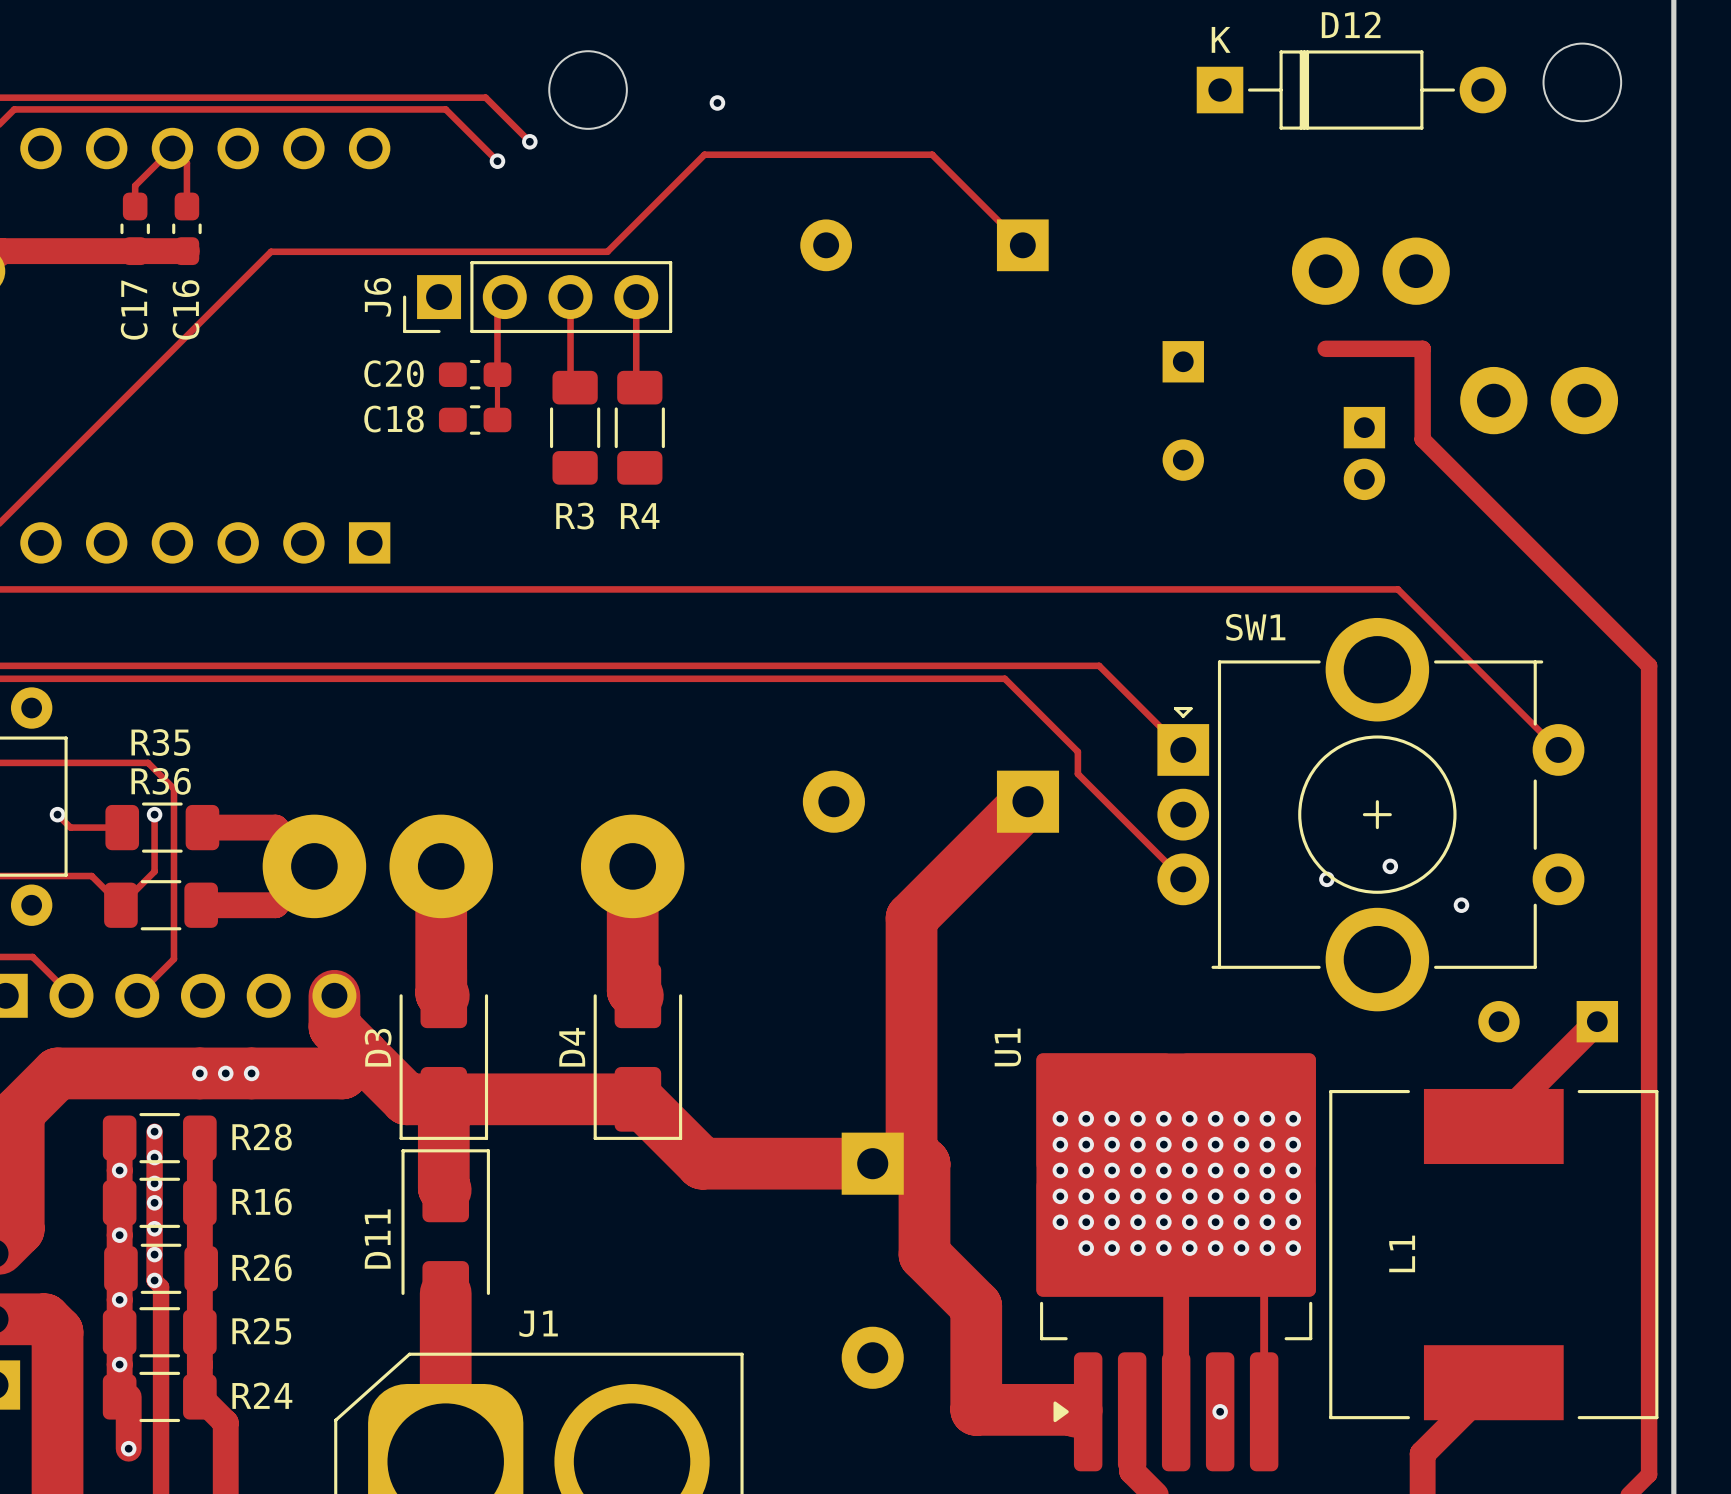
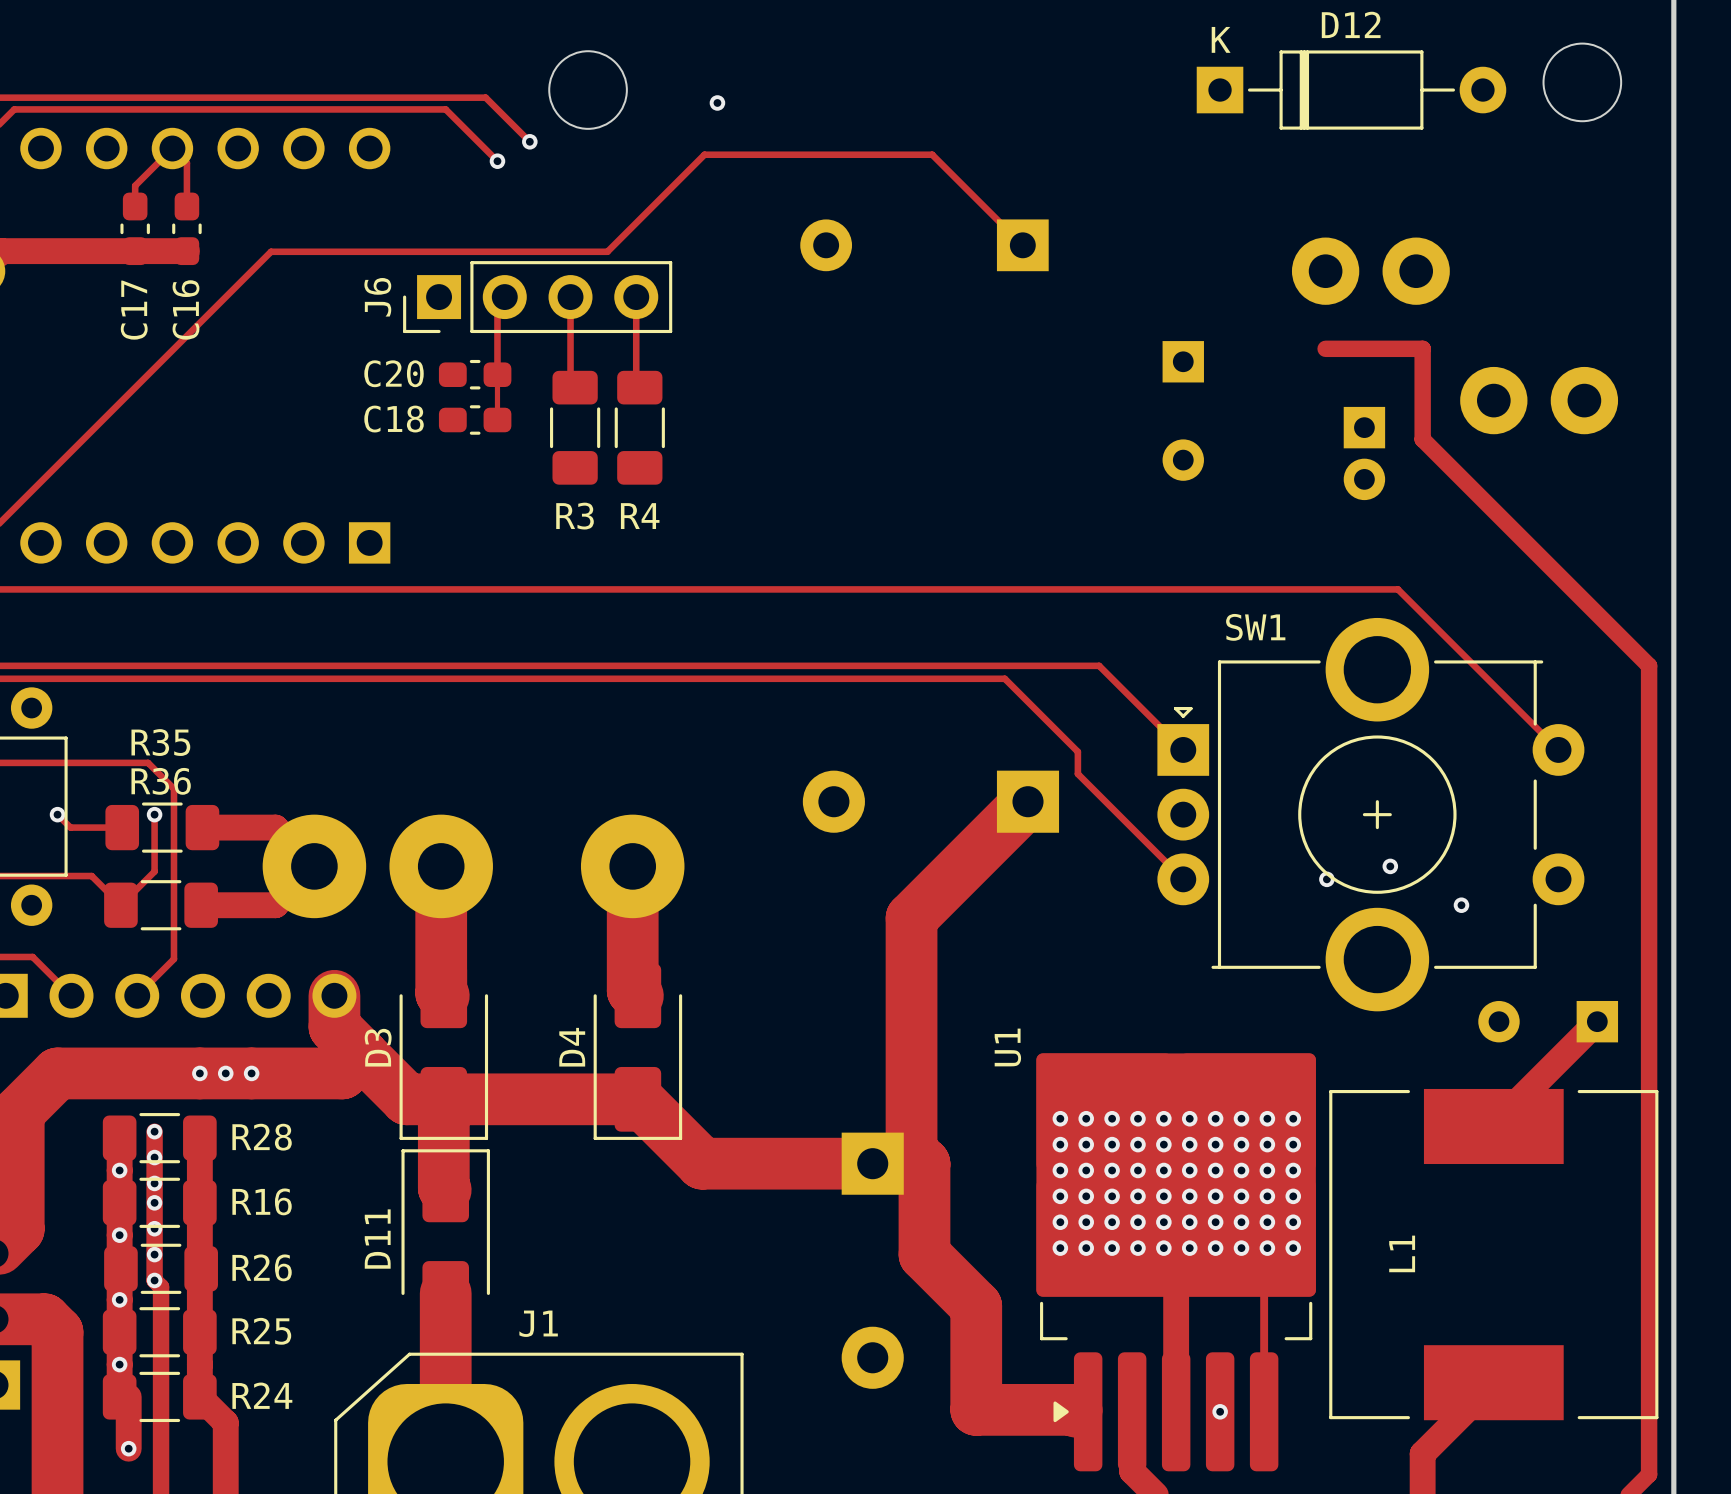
via: none -> (1060, 1248)

